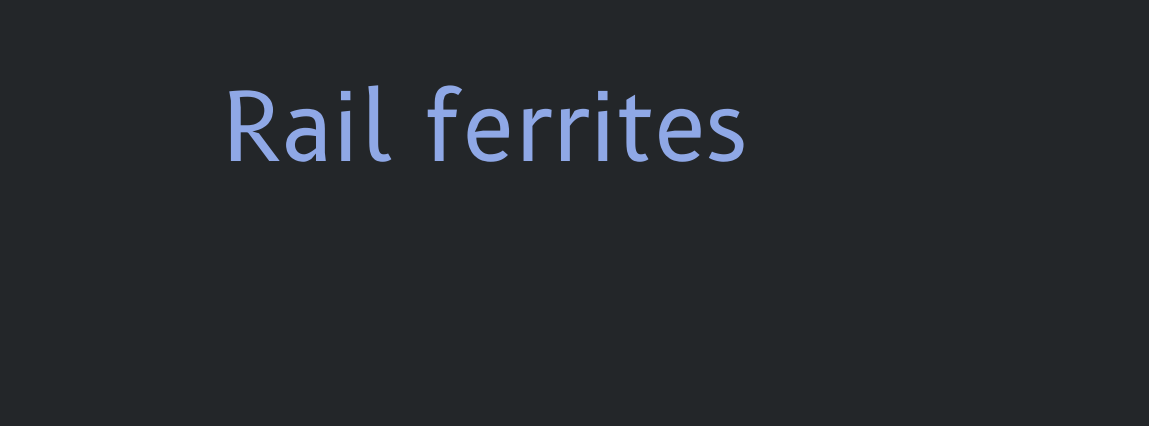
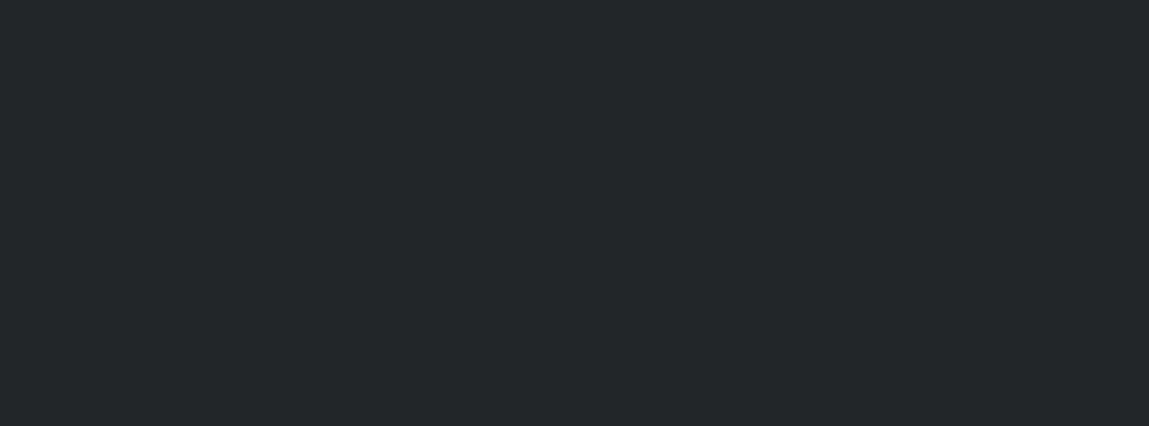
text: Rail ferrites (486, 123) -> none

